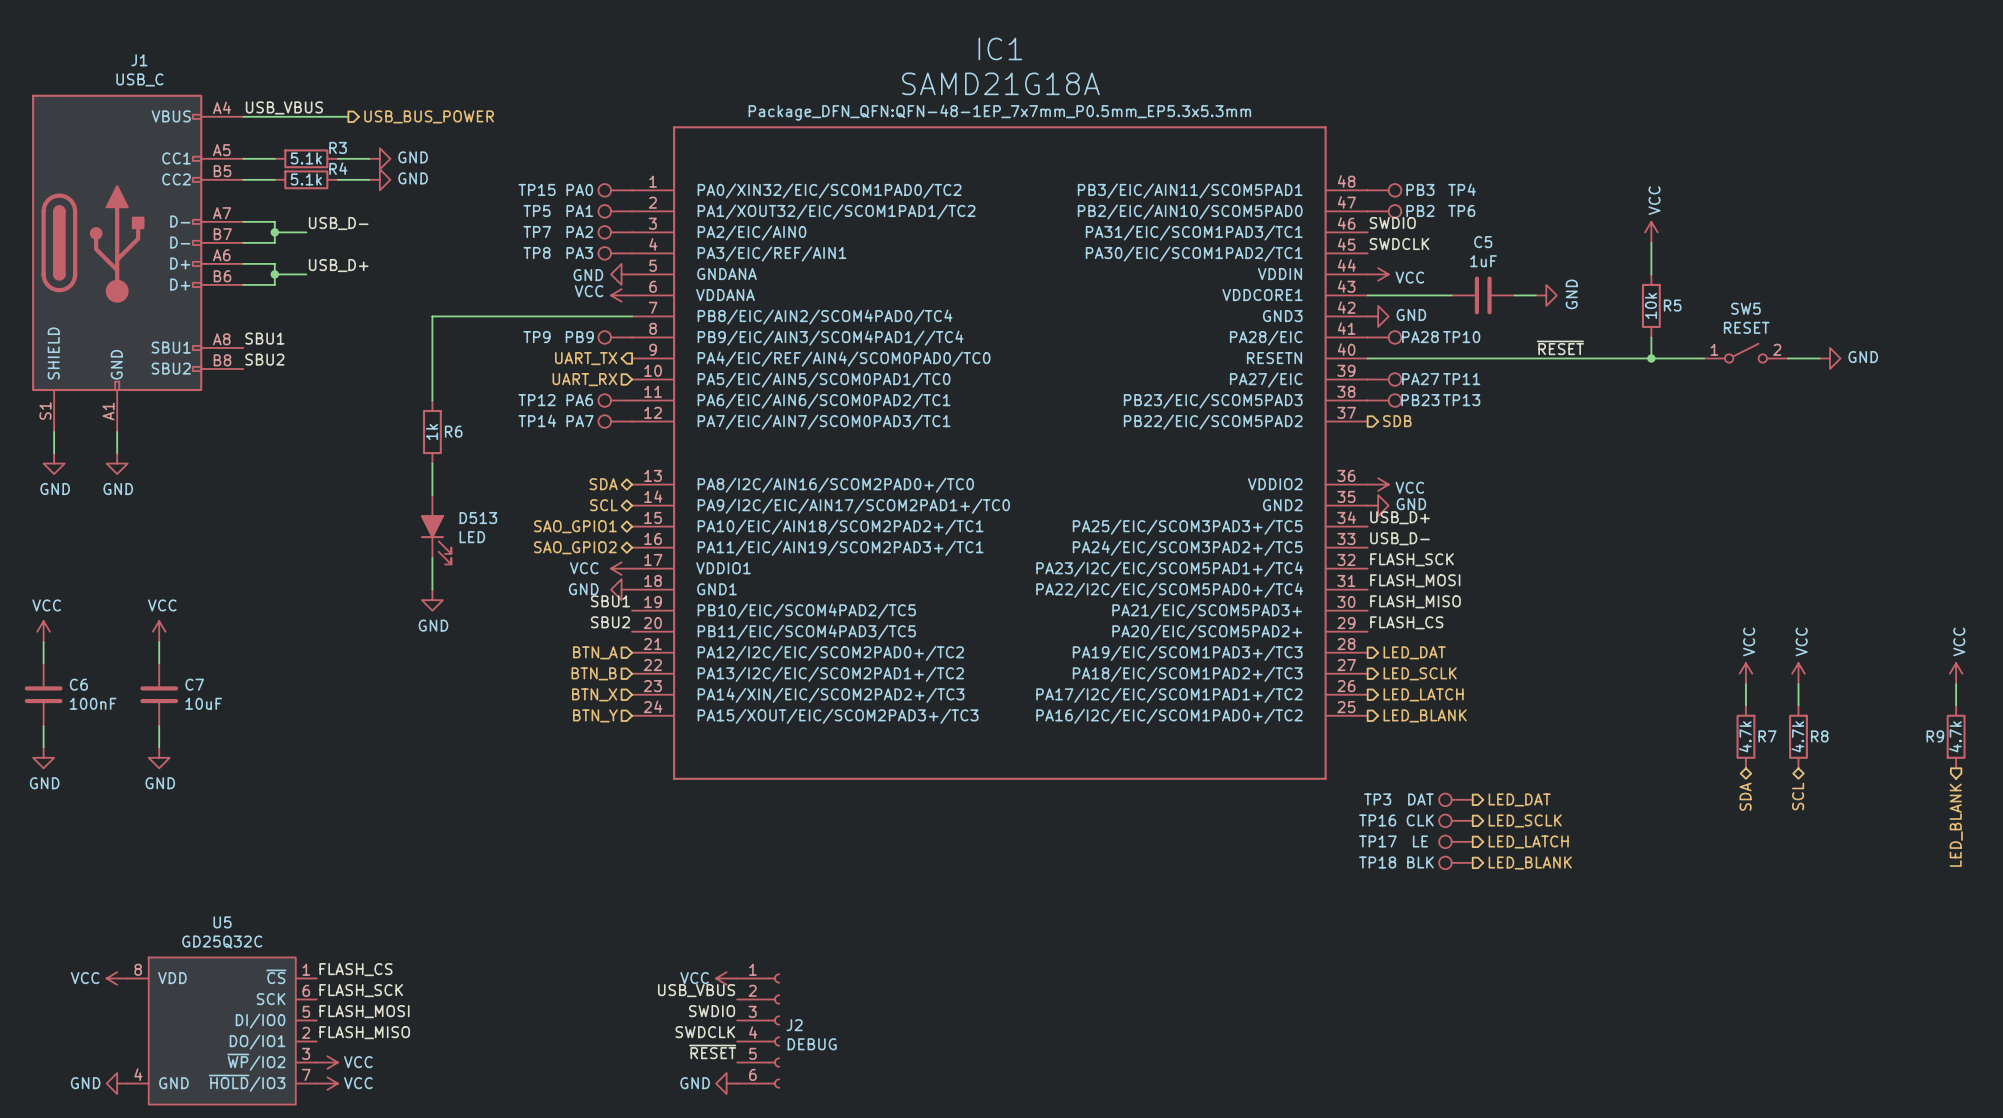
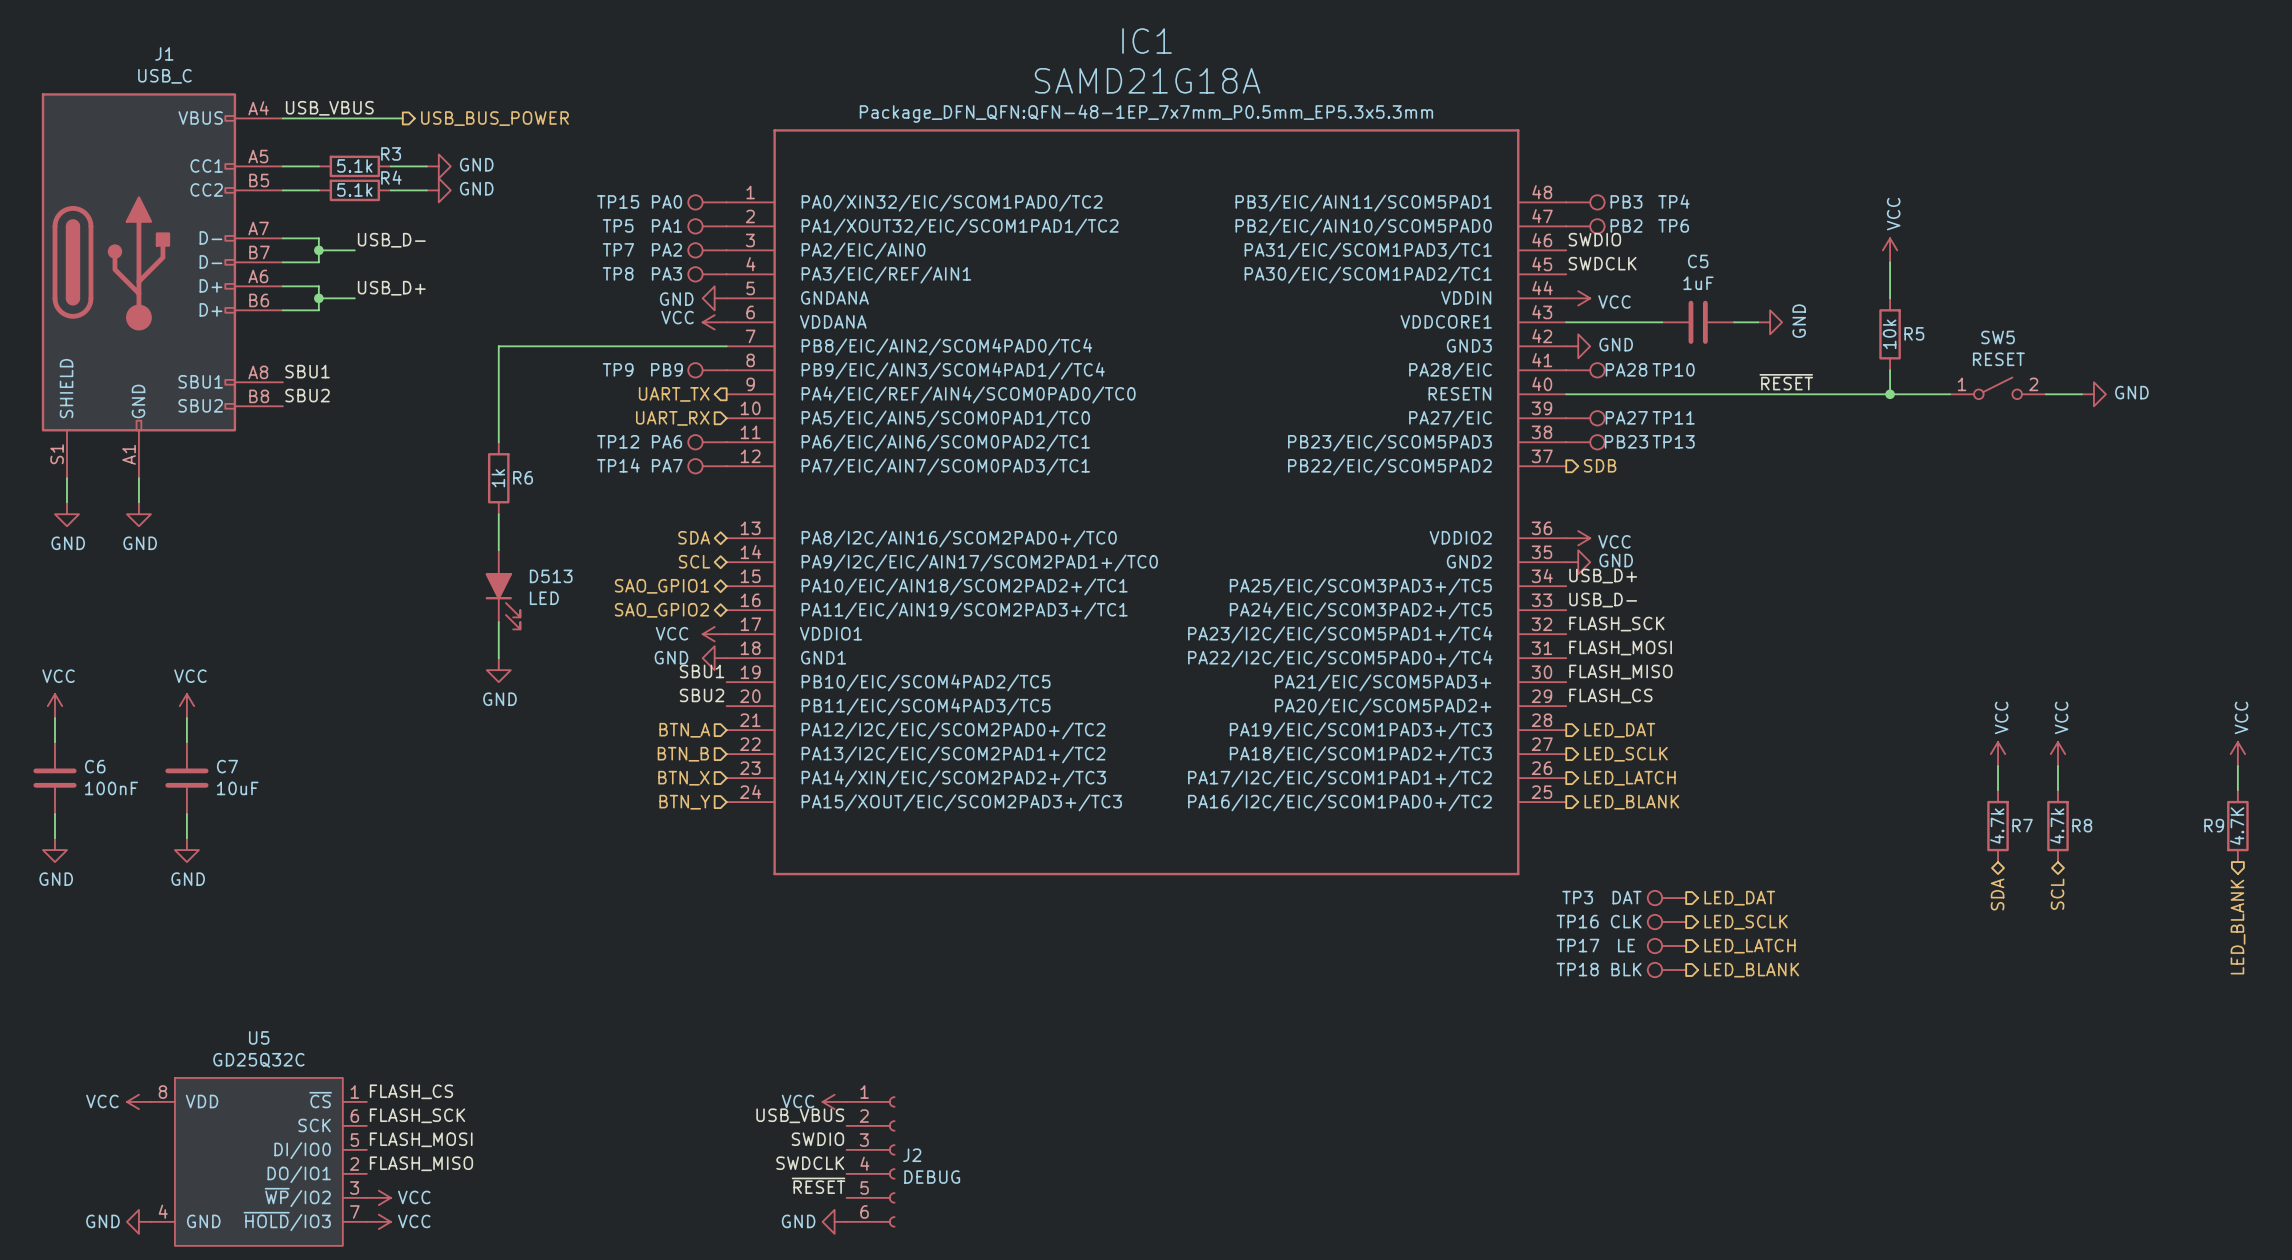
R9 value: 4.7k (1955, 736) -> 4.7K (2237, 826)

